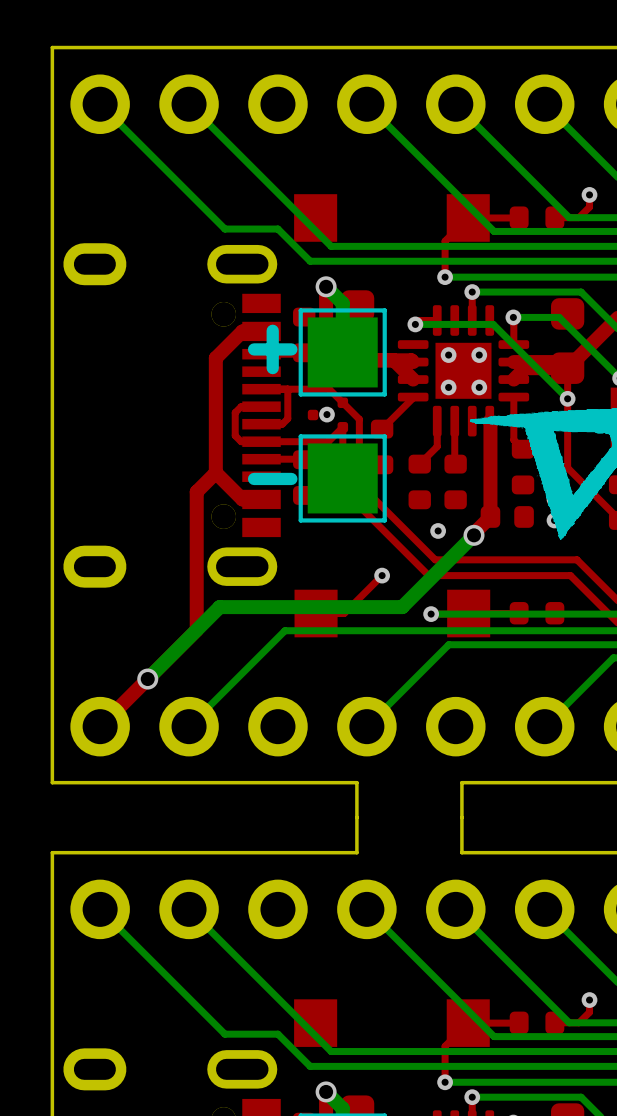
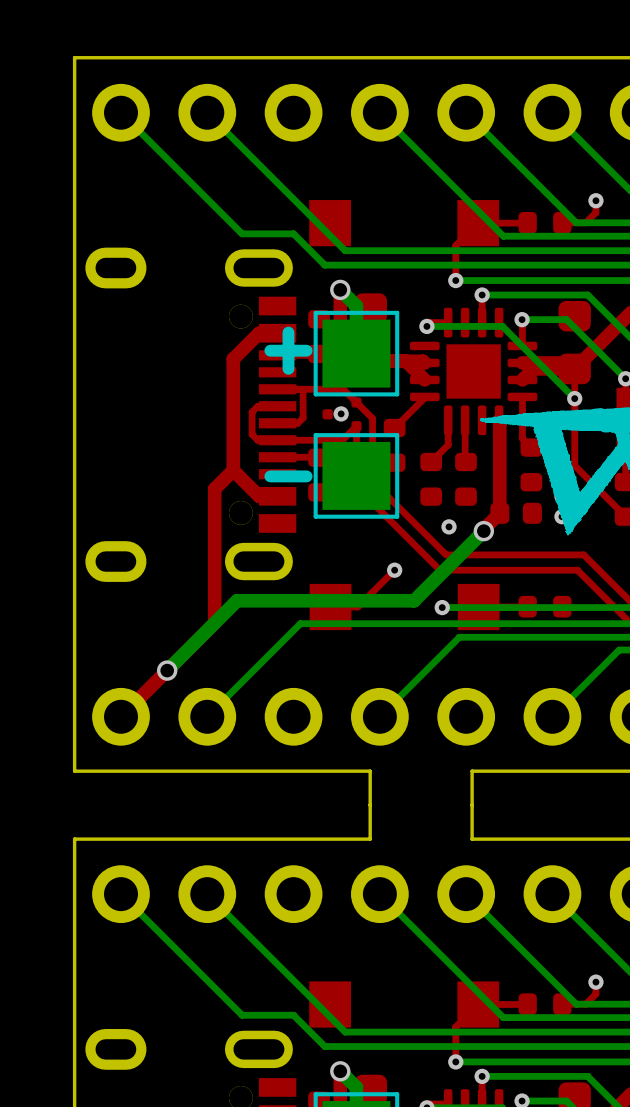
via: (448, 355) -> none
via: (479, 355) -> none
via: (448, 387) -> none
via: (479, 387) -> none

